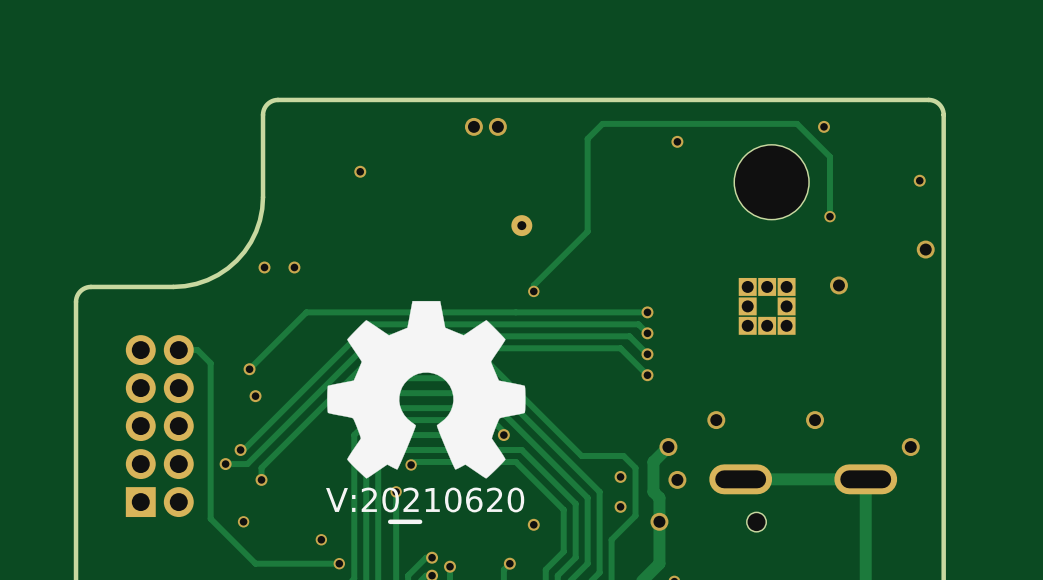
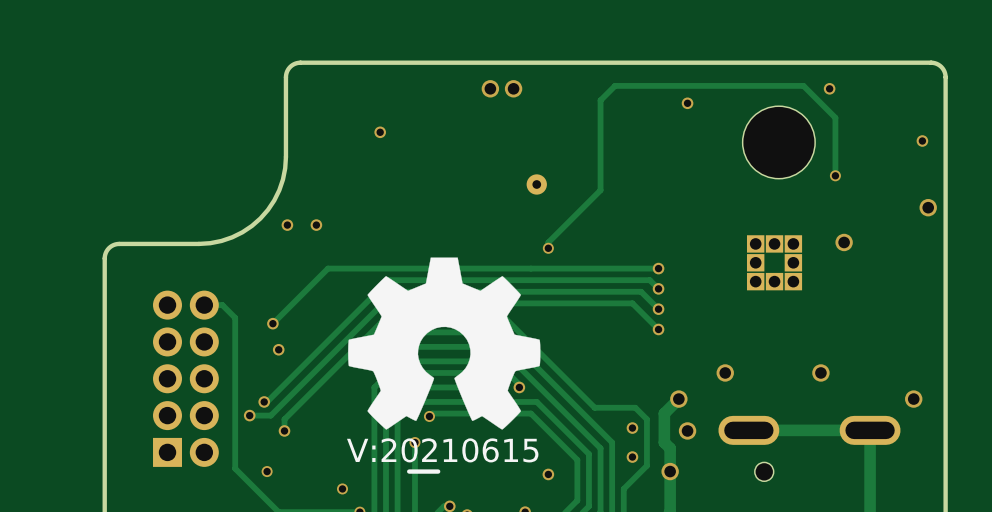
drawing shape: [326, 487, 525, 525] -> [347, 438, 539, 474]

